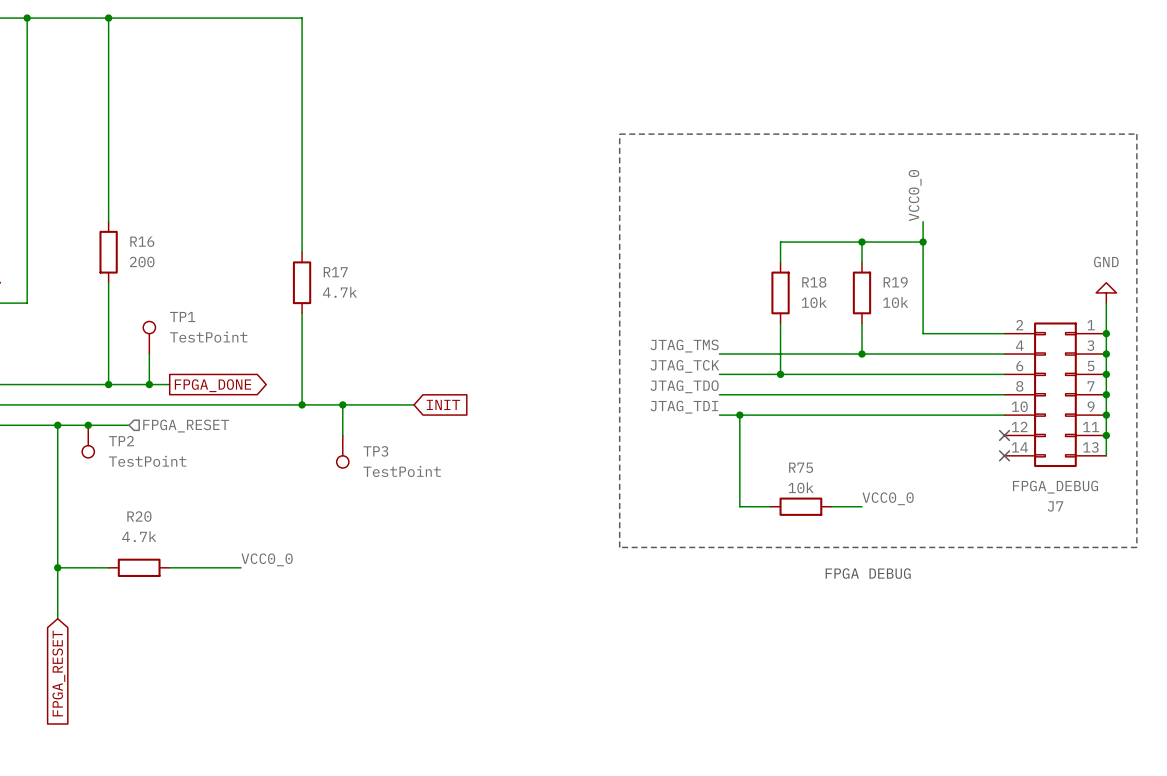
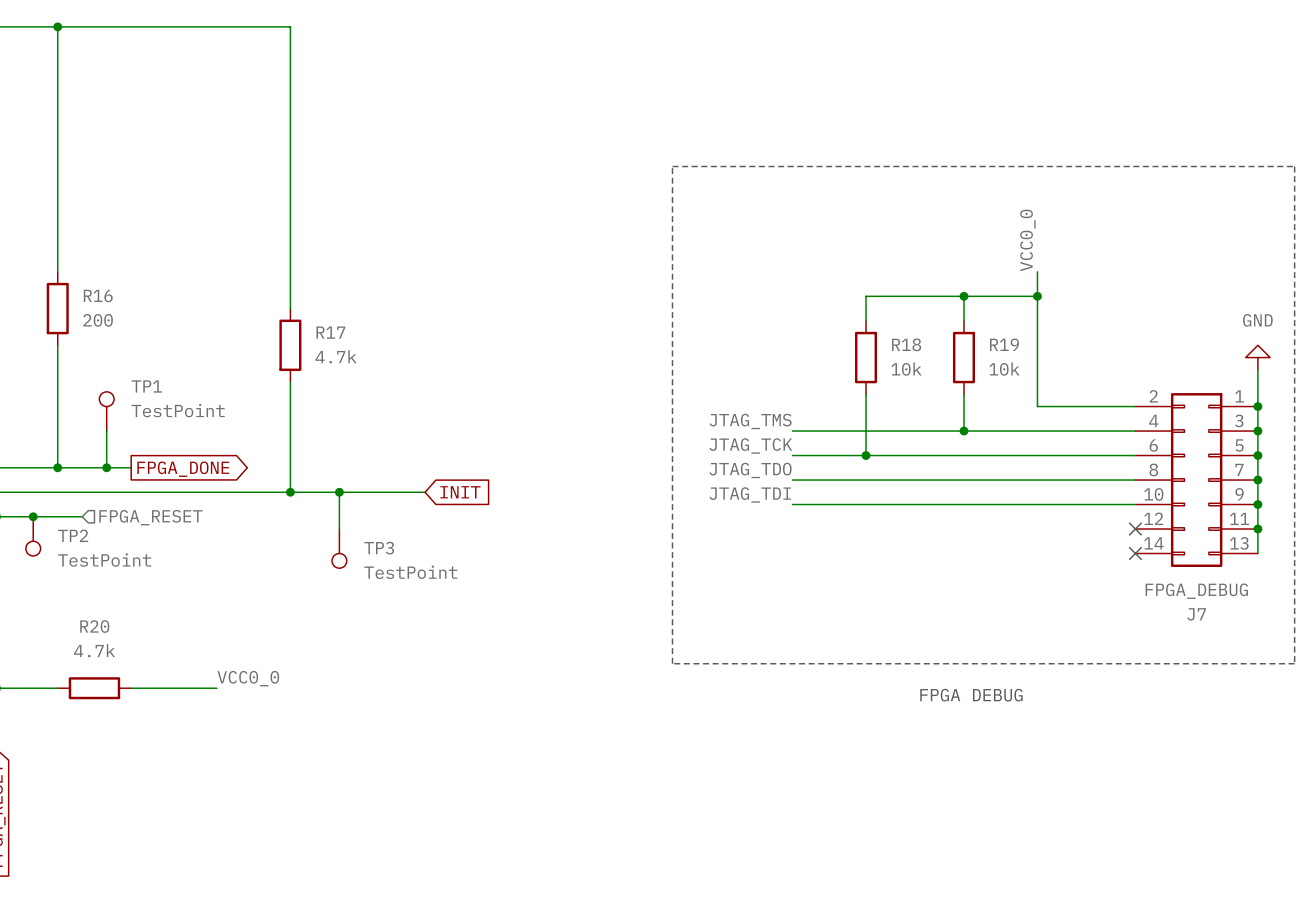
wire: (739, 415) (739, 506) (770, 506) -> none
junction: (739, 415) -> none
label: VCC0_0 (888, 498) -> none
R75: 10k (800, 506) -> none
wire: (831, 506) (861, 506) -> none

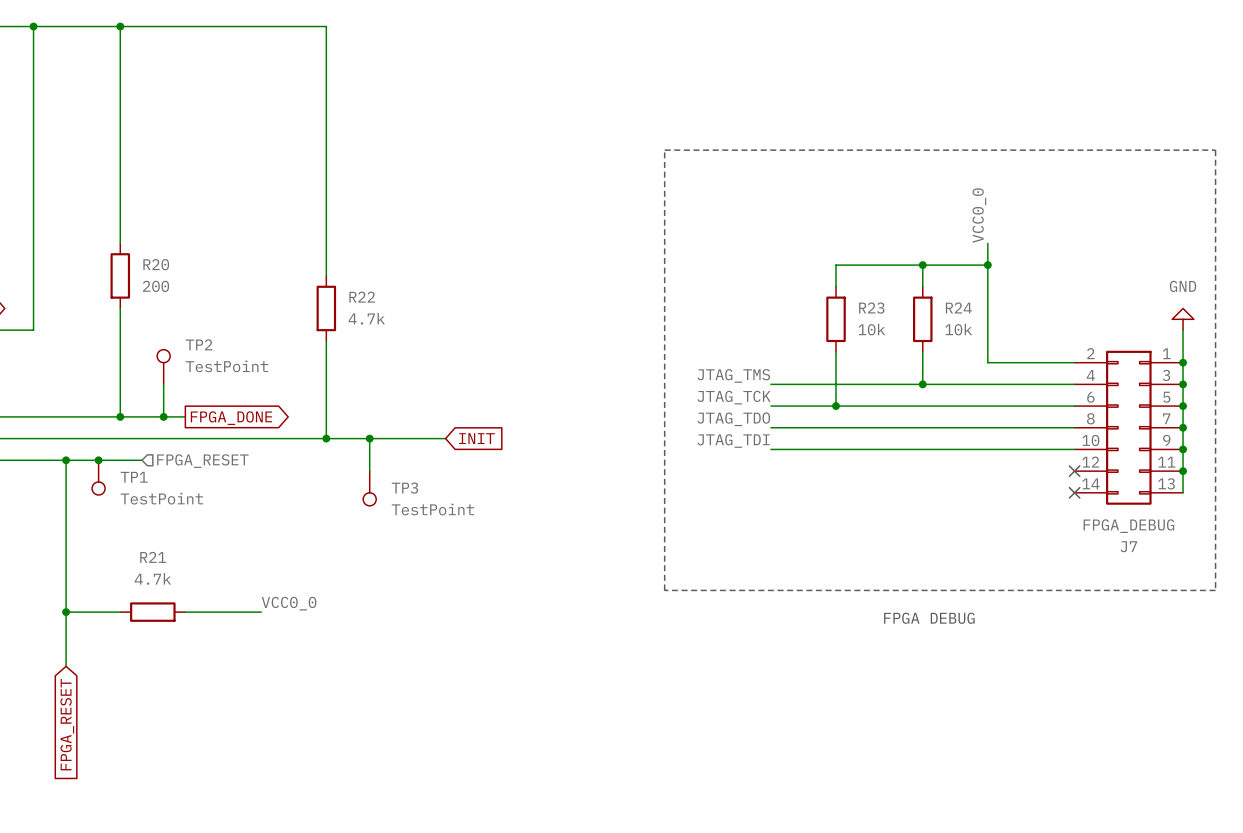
R16 name: R16 (98, 295) -> R20 (156, 264)
R17 name: R17 (330, 332) -> R22 (362, 297)
R18 name: R18 (906, 344) -> R23 (871, 308)
R19 name: R19 (1004, 344) -> R24 (958, 307)
TP1 name: TP1 (146, 386) -> TP2 (199, 344)
TP2 name: TP2 (73, 535) -> TP1 (134, 477)
R20 name: R20 (94, 626) -> R21 (153, 557)

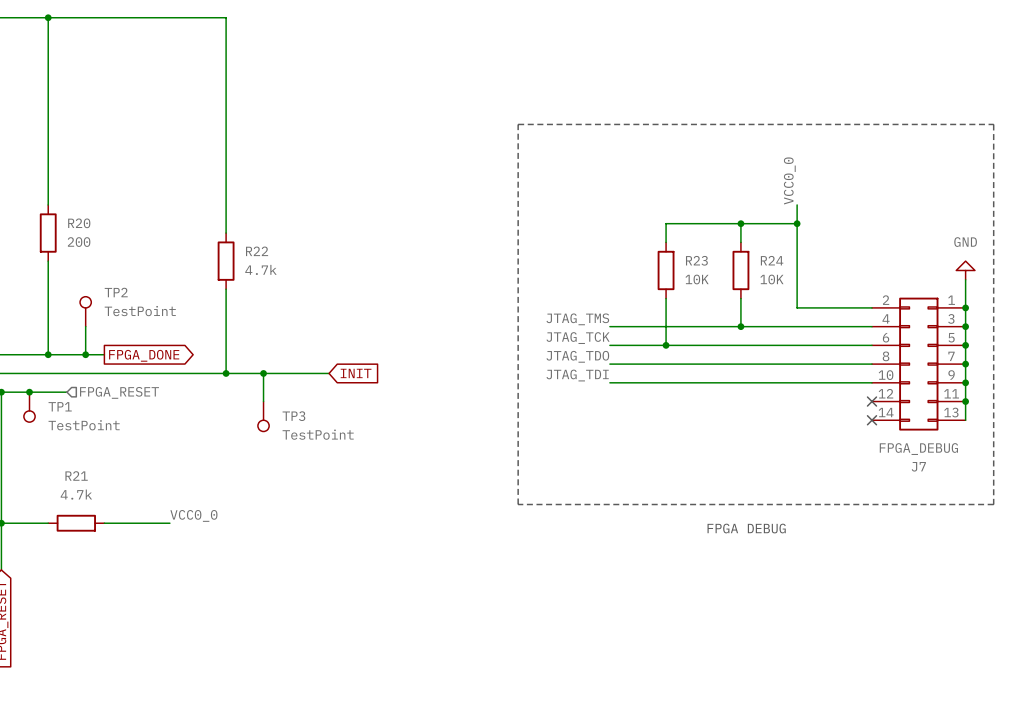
R23 value: 10k (871, 329) -> 10K (697, 279)
R24 value: 10k (958, 329) -> 10K (771, 279)

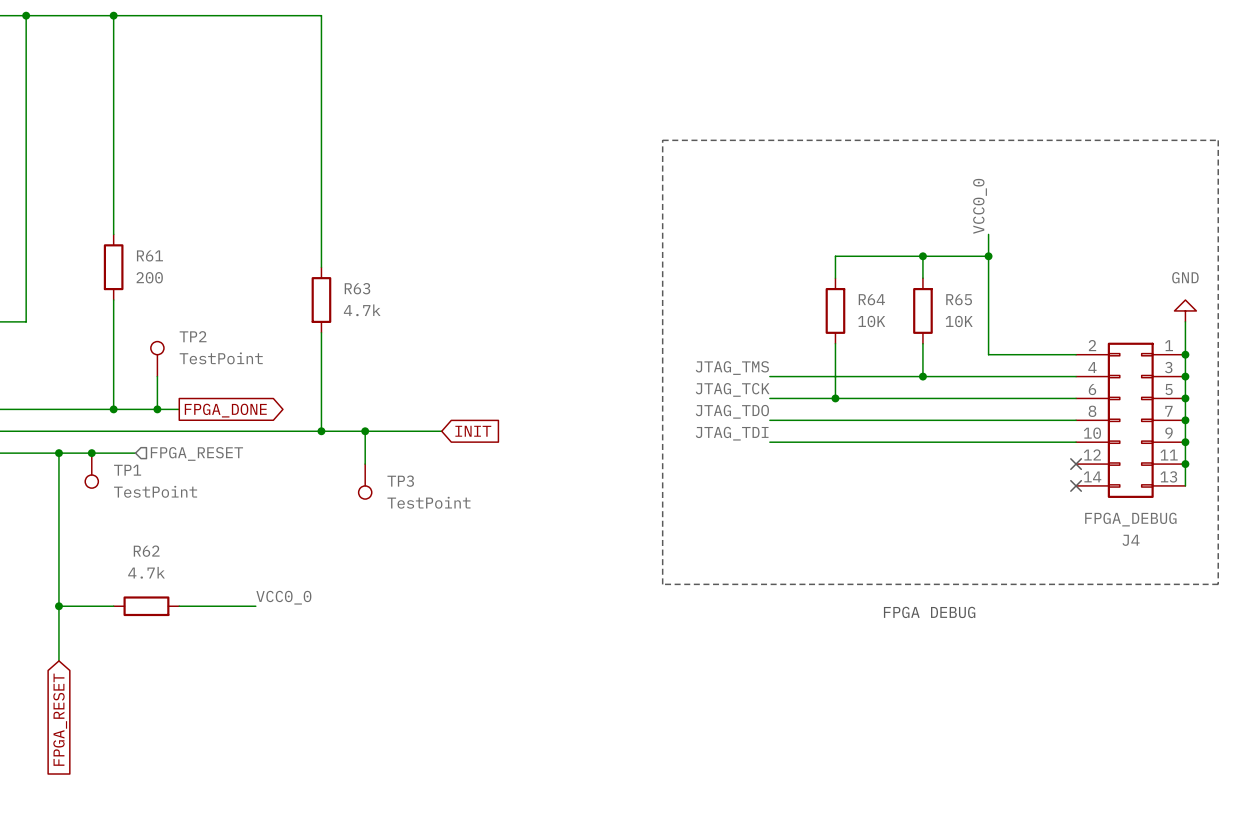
R20 name: R20 (79, 223) -> R61 (149, 255)
R22 name: R22 (257, 251) -> R63 (357, 288)
R23 name: R23 (696, 260) -> R64 (871, 299)
R24 name: R24 (772, 260) -> R65 (959, 299)
J7 name: J7 (918, 466) -> J4 (1131, 540)
R21 name: R21 (76, 476) -> R62 (146, 551)

